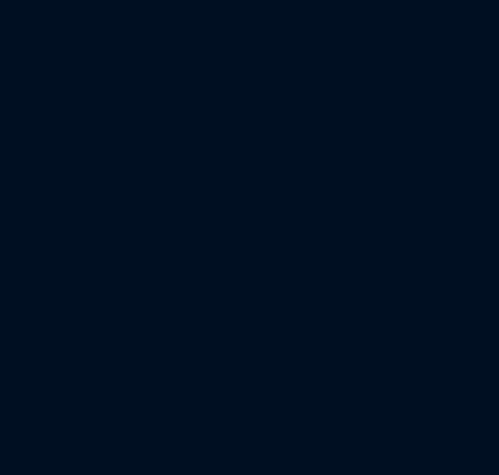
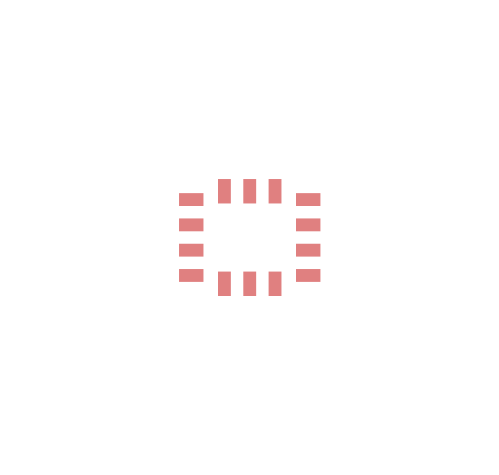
part: none -> (249, 237)

